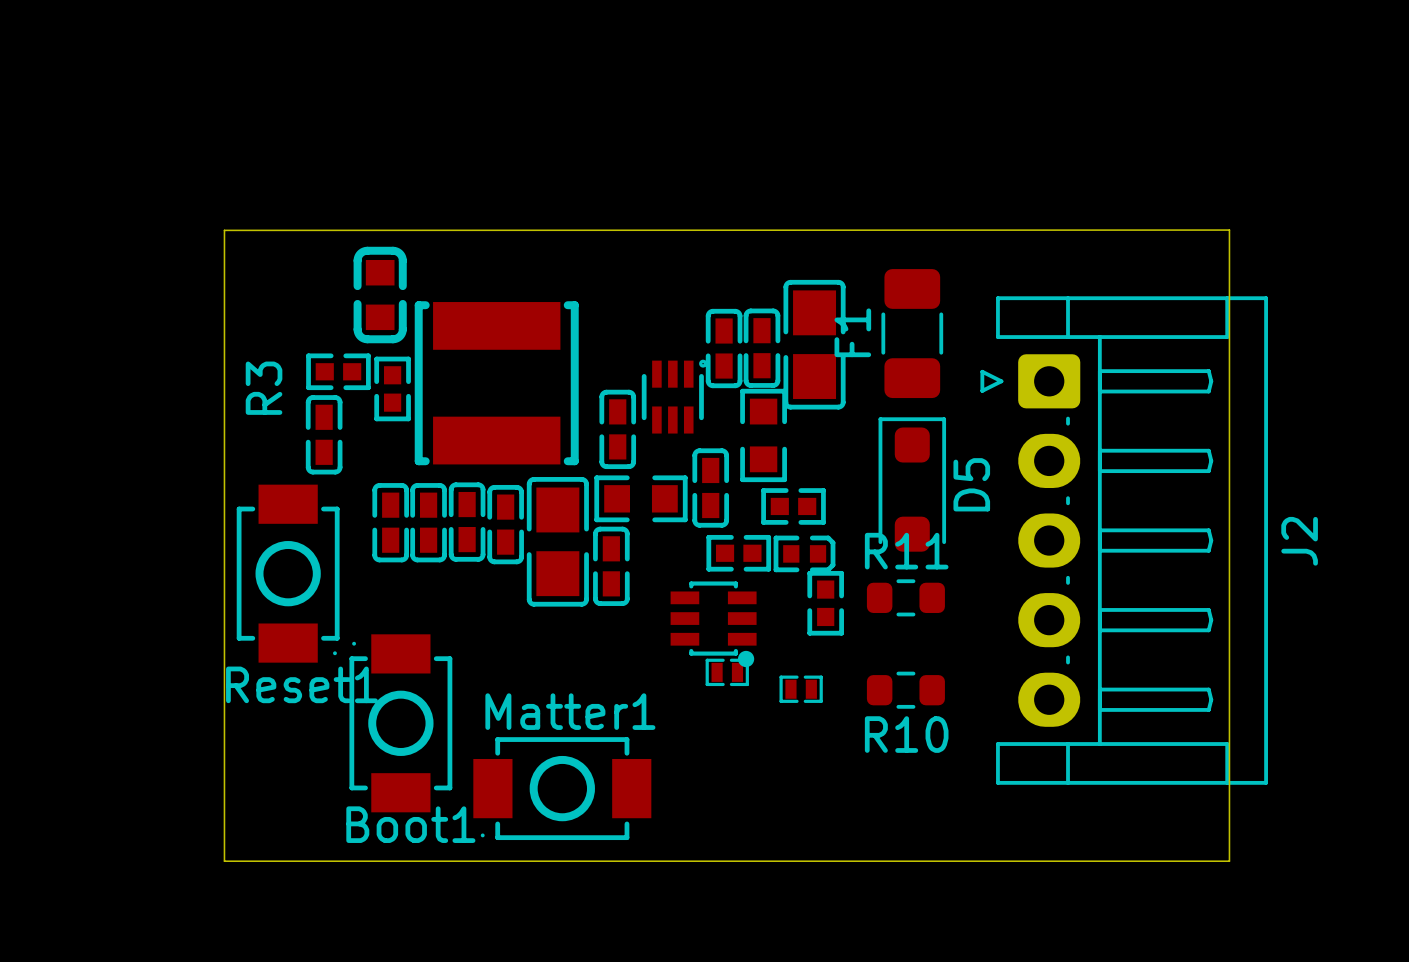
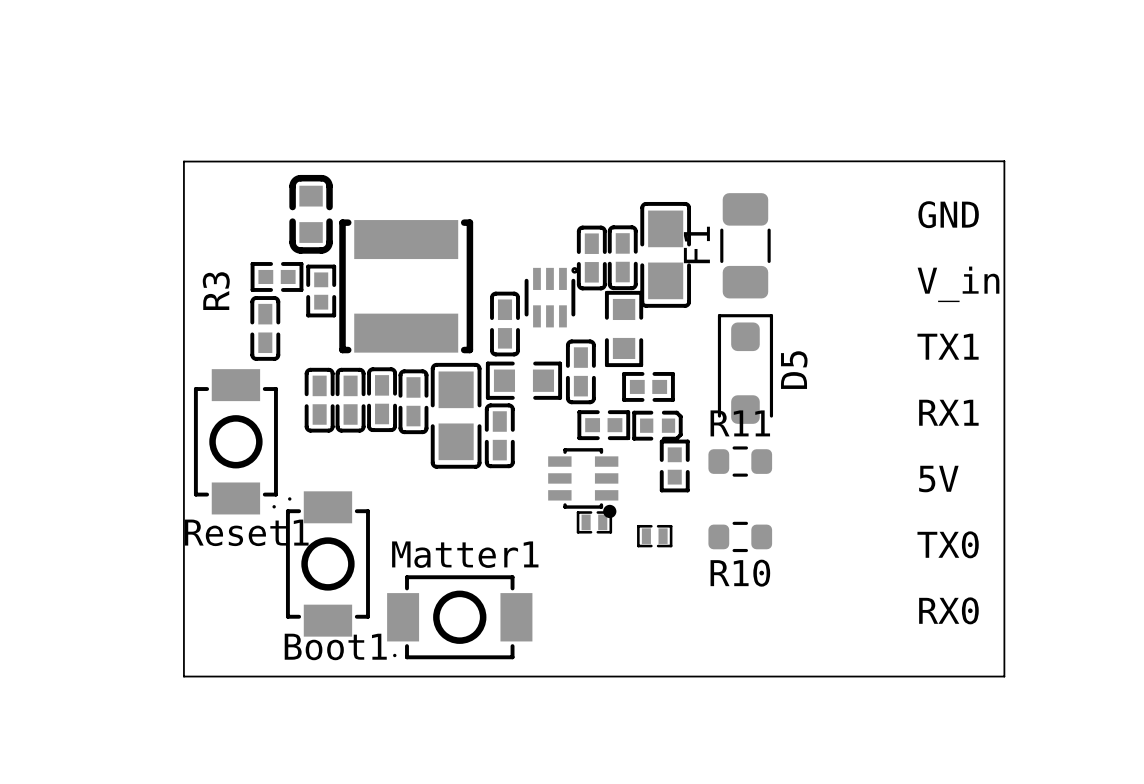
text: none -> GND (948, 214)
text: none -> V_in (958, 284)
text: none -> TX1 (948, 346)
text: none -> RX1 (948, 412)
J2: (1124, 540) -> none
text: none -> 5V (938, 479)
text: none -> TX0 (948, 544)
text: none -> RX0 (948, 610)

